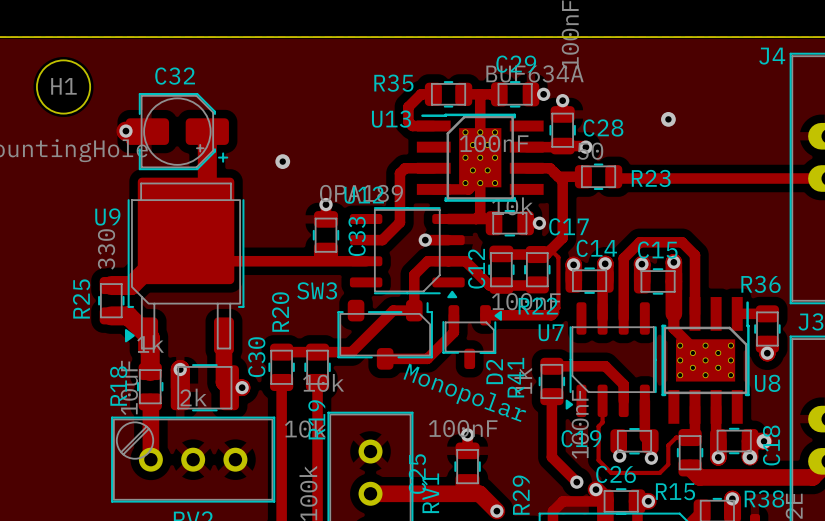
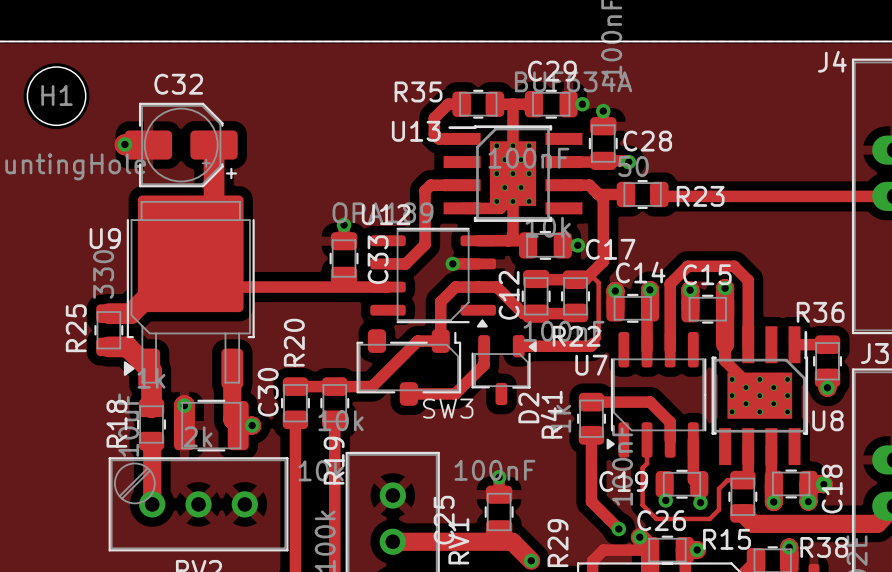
via: (668, 119) -> none
via: (282, 161) -> none
SW3 name position: SW3 (317, 290) -> SW3 (448, 408)
text: Monopolar (464, 392) -> none

